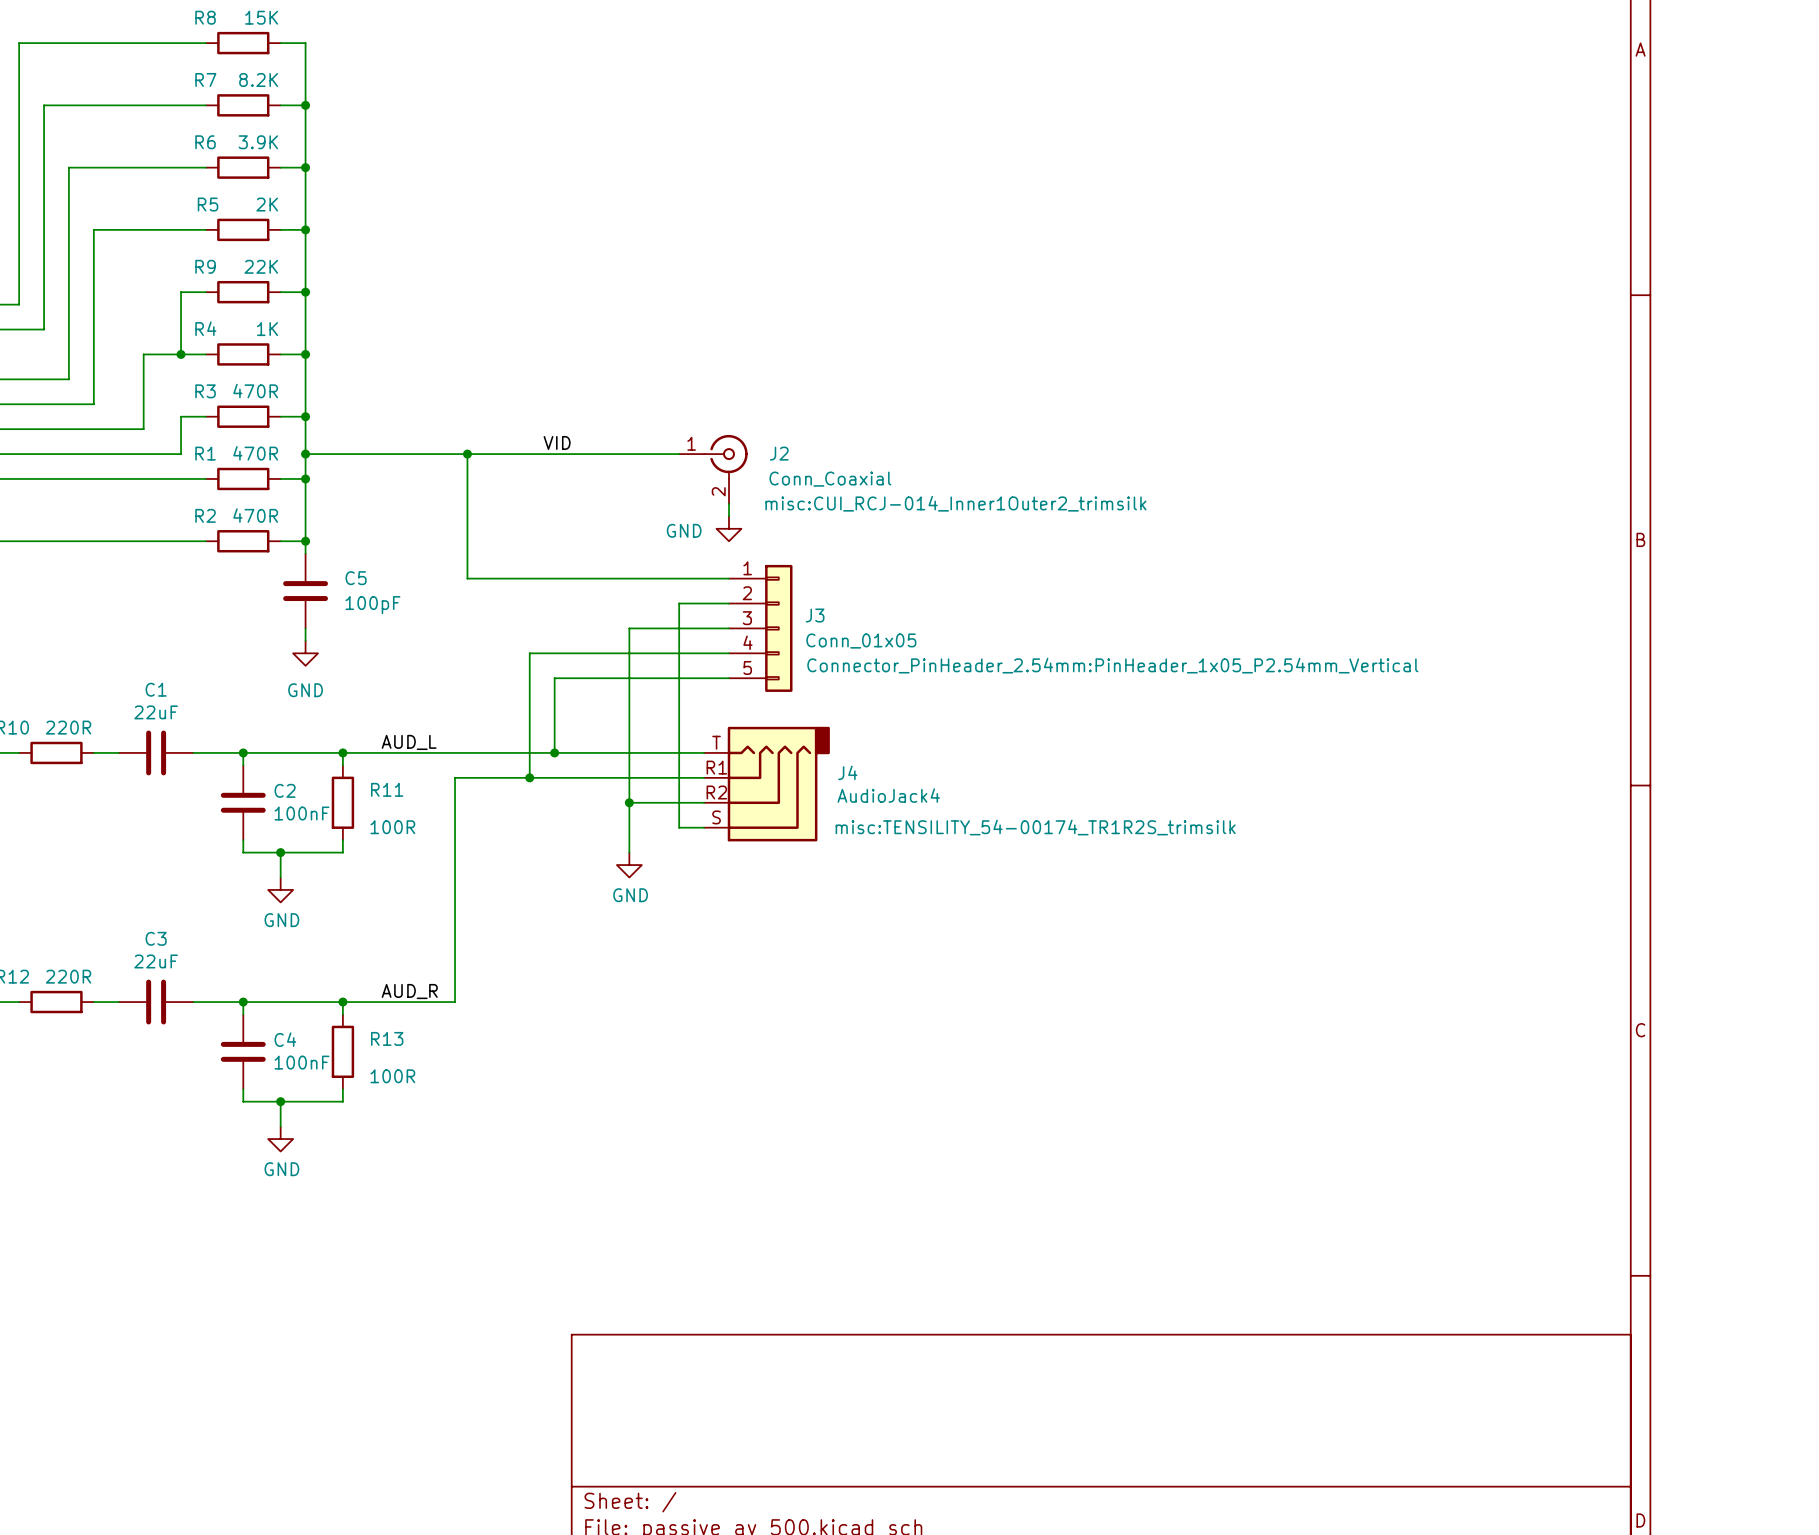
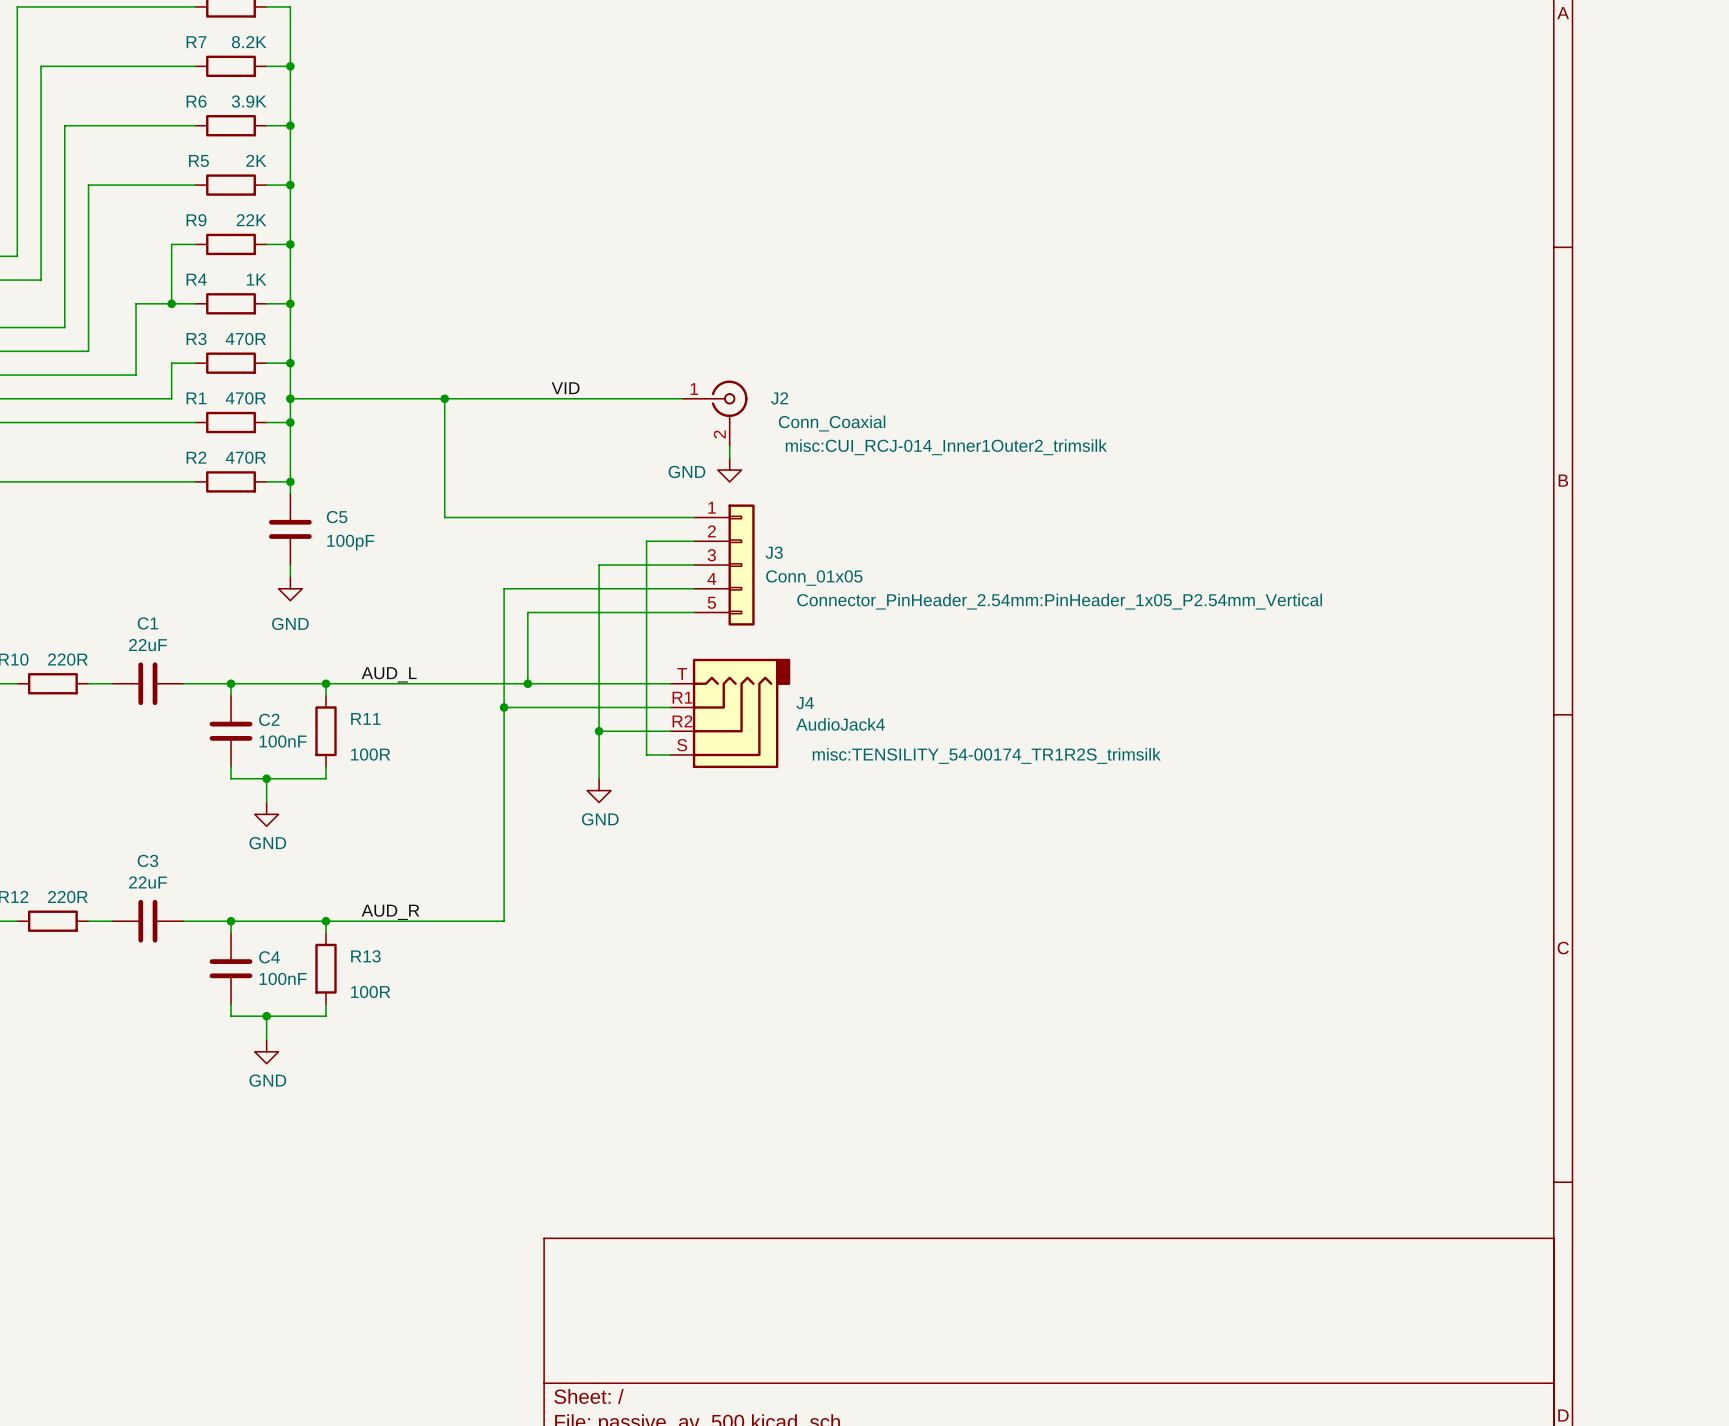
label position: VID (557, 442) -> VID (565, 388)
J2 position: (713, 469) -> (714, 413)
wire: (728, 503) (728, 516) -> (729, 446) (729, 458)
power symbol position: GND (728, 528) -> GND (729, 470)
wire: (529, 777) (455, 777) (455, 1002) -> (504, 707) (504, 921) (432, 921)

